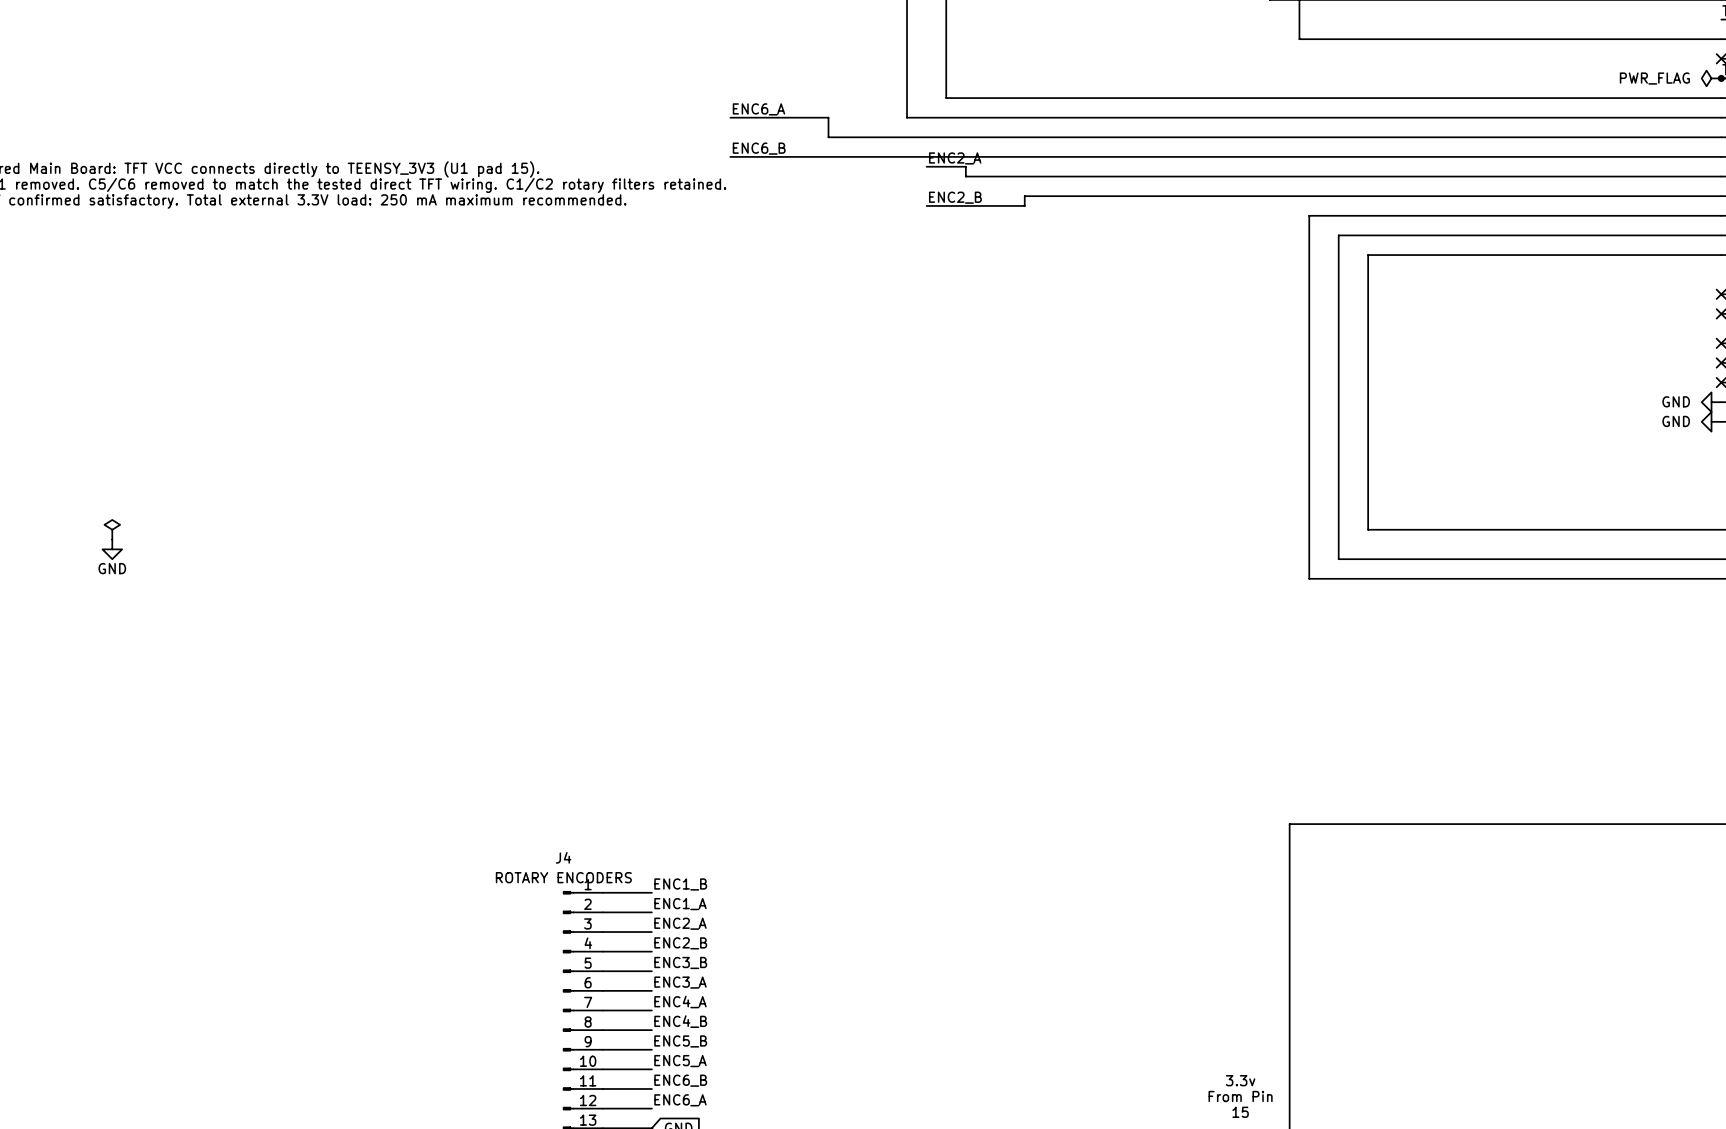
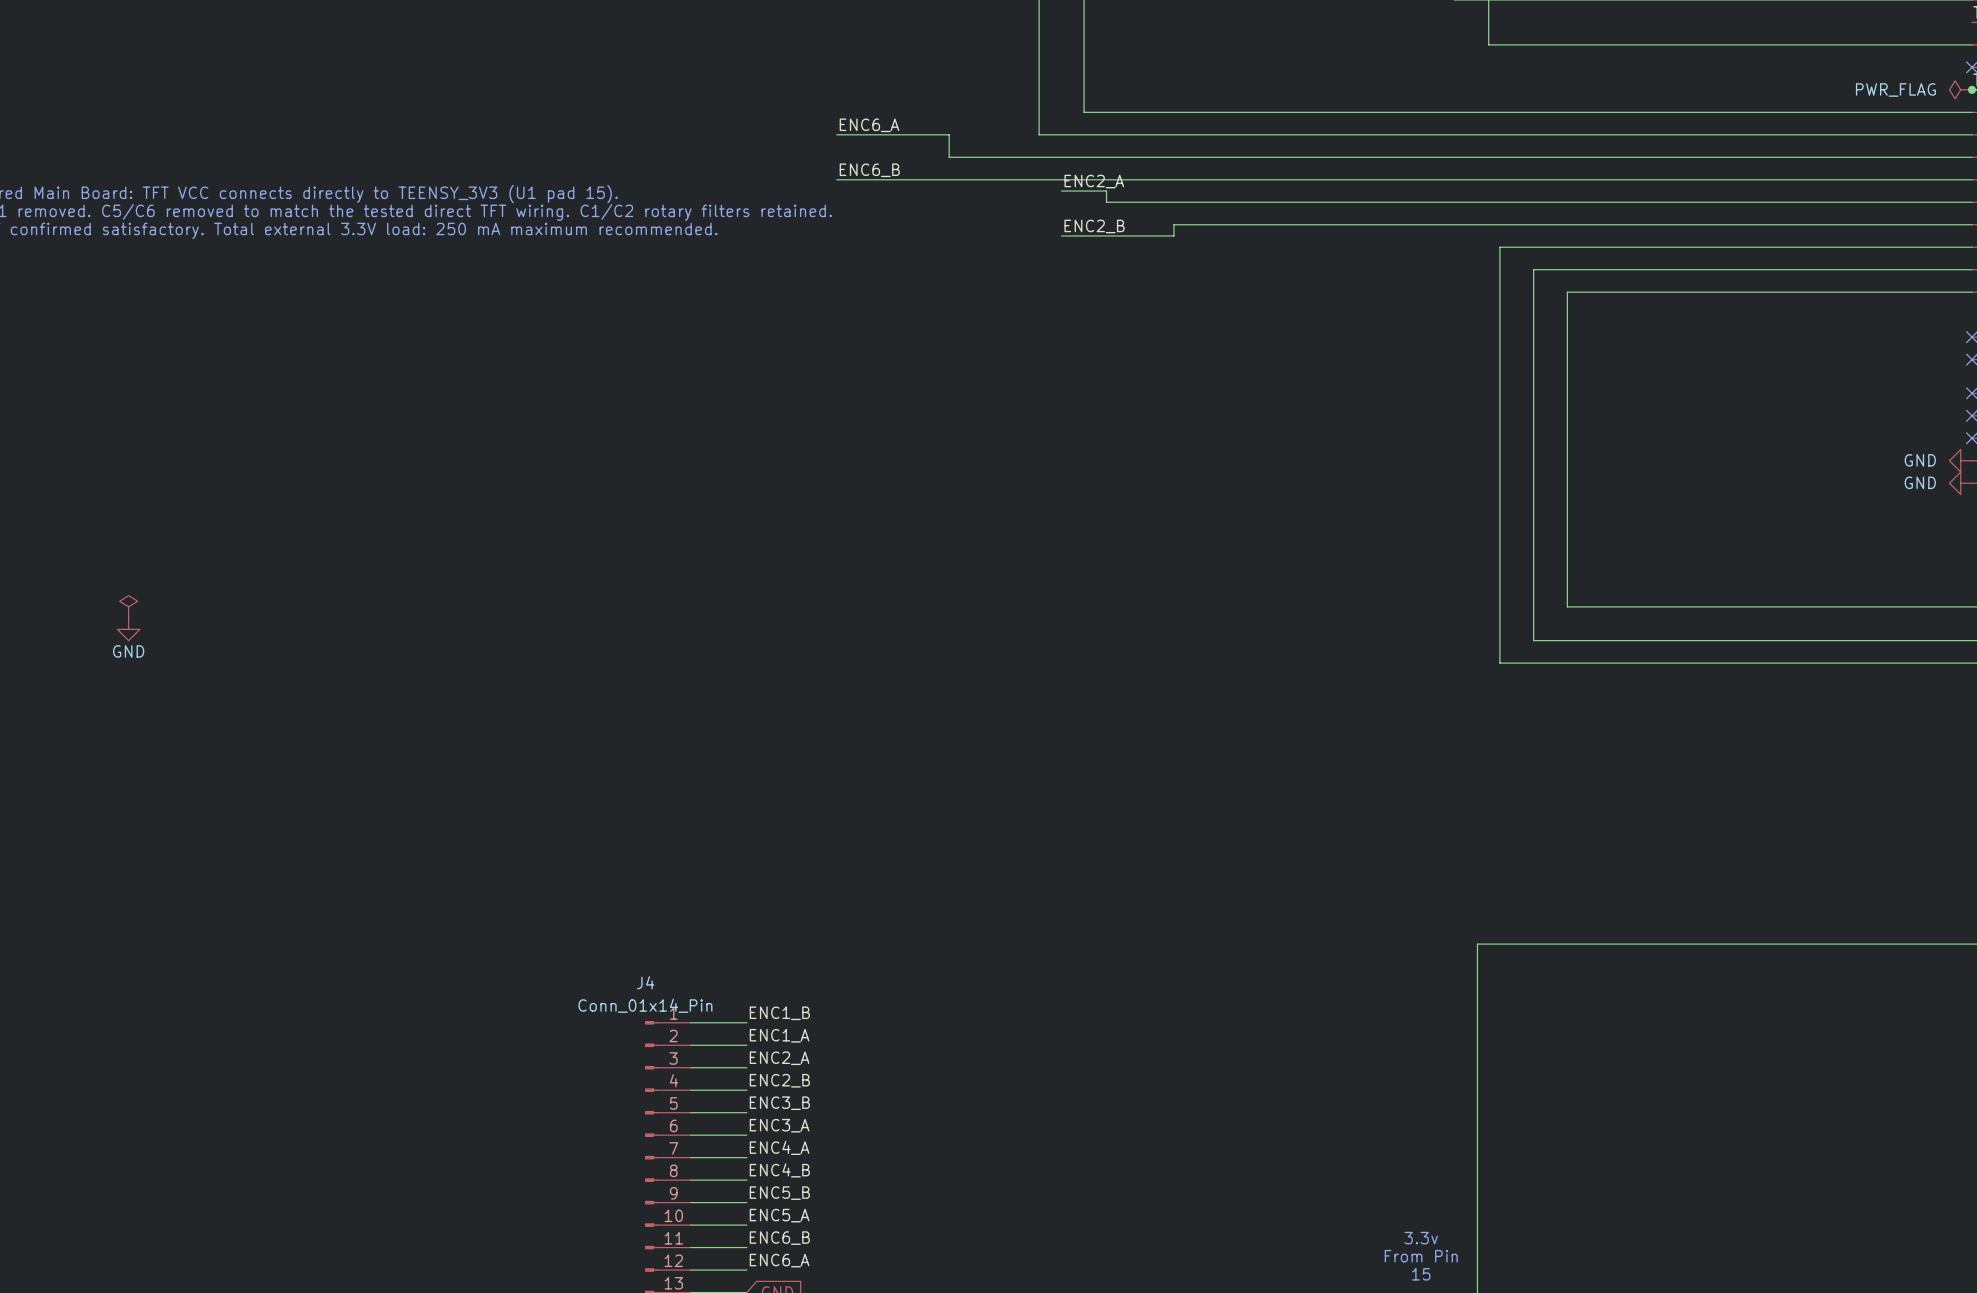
J4 value: ROTARY ENCODERS (563, 877) -> Conn_01x14_Pin (645, 1005)

